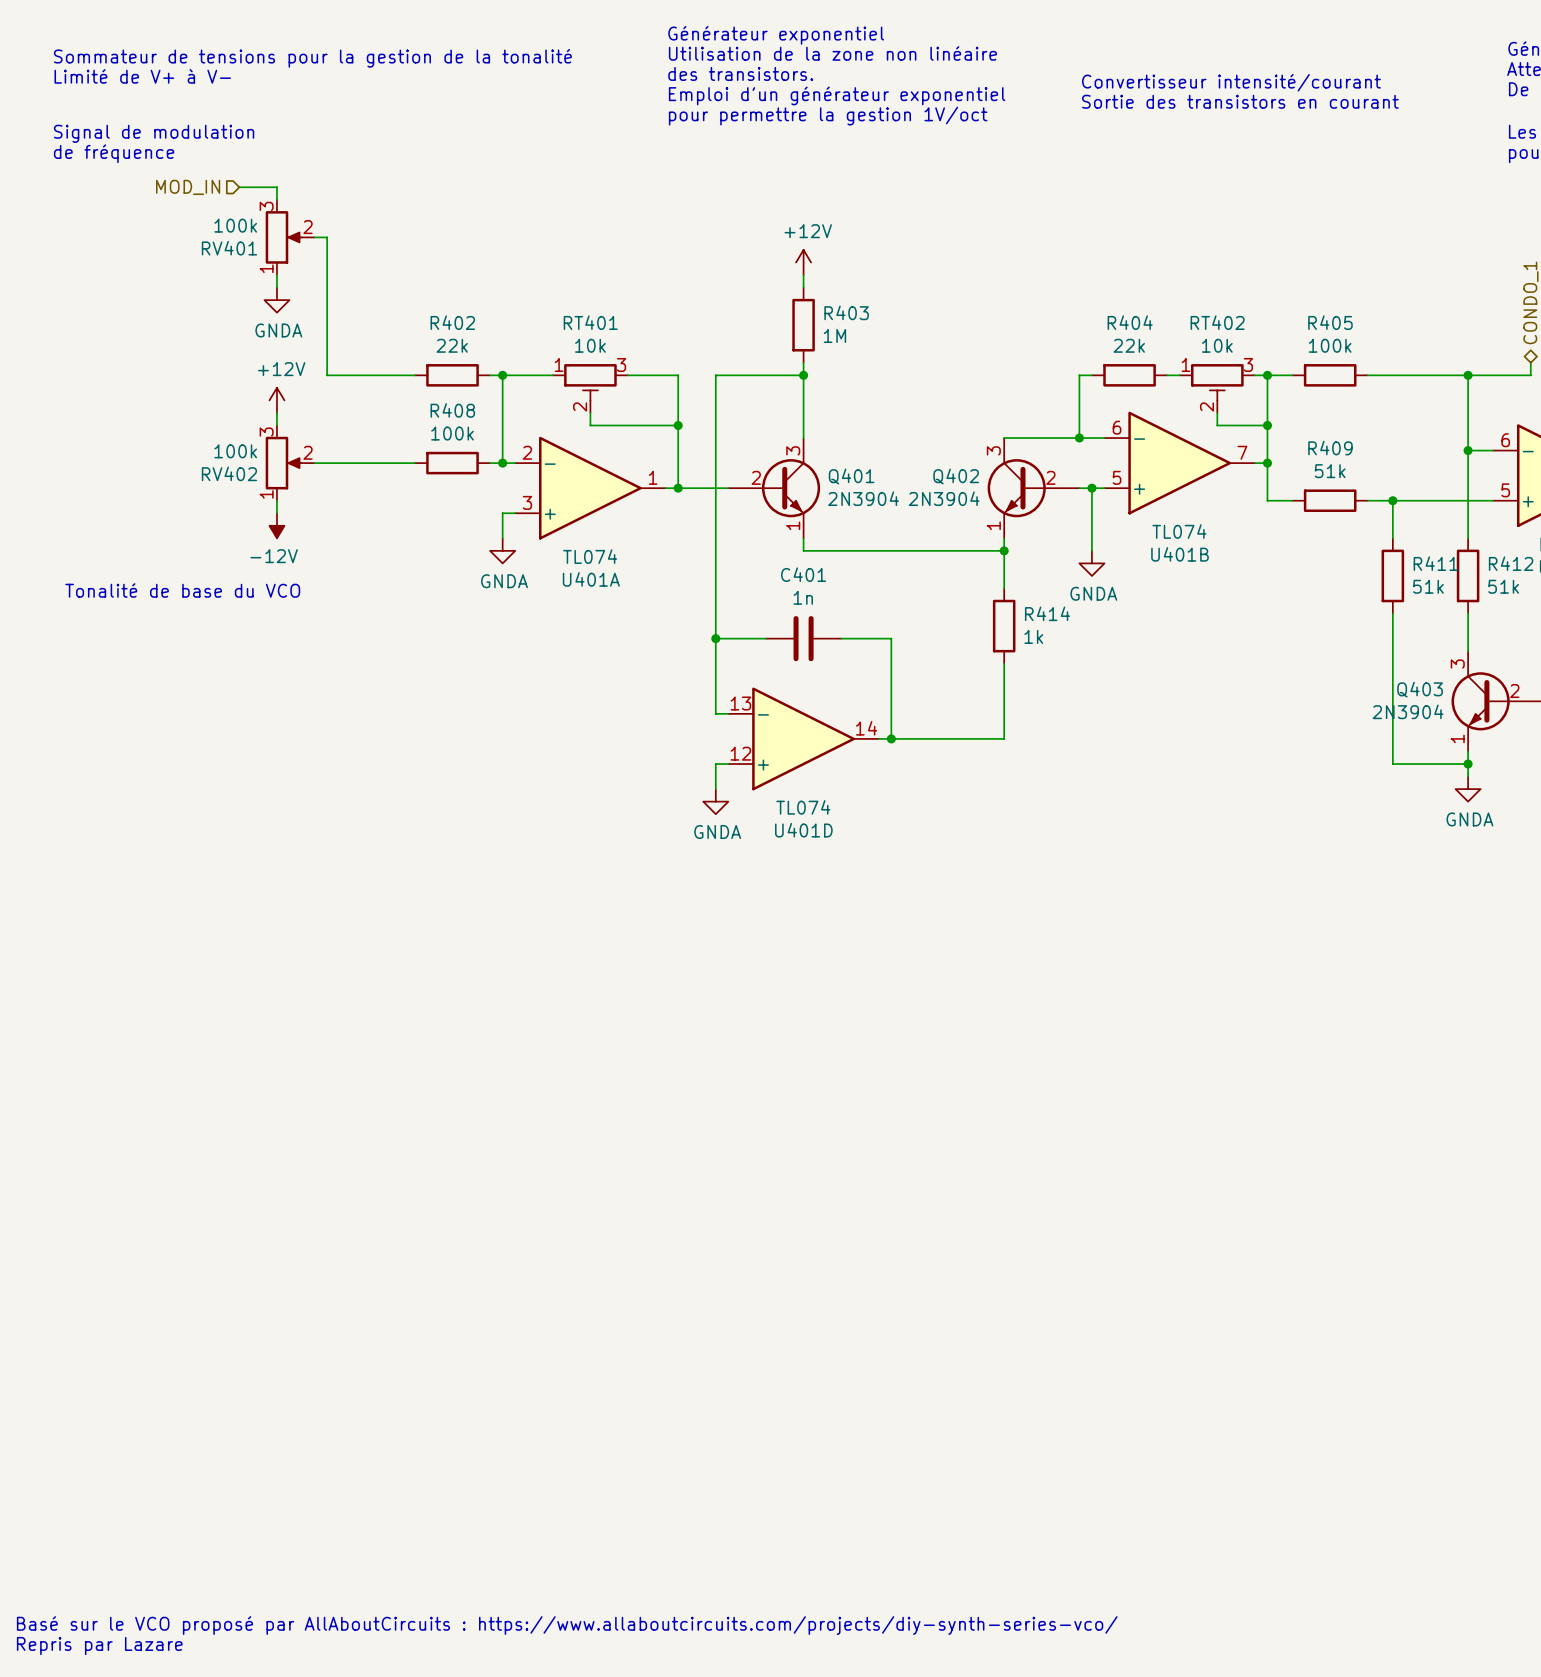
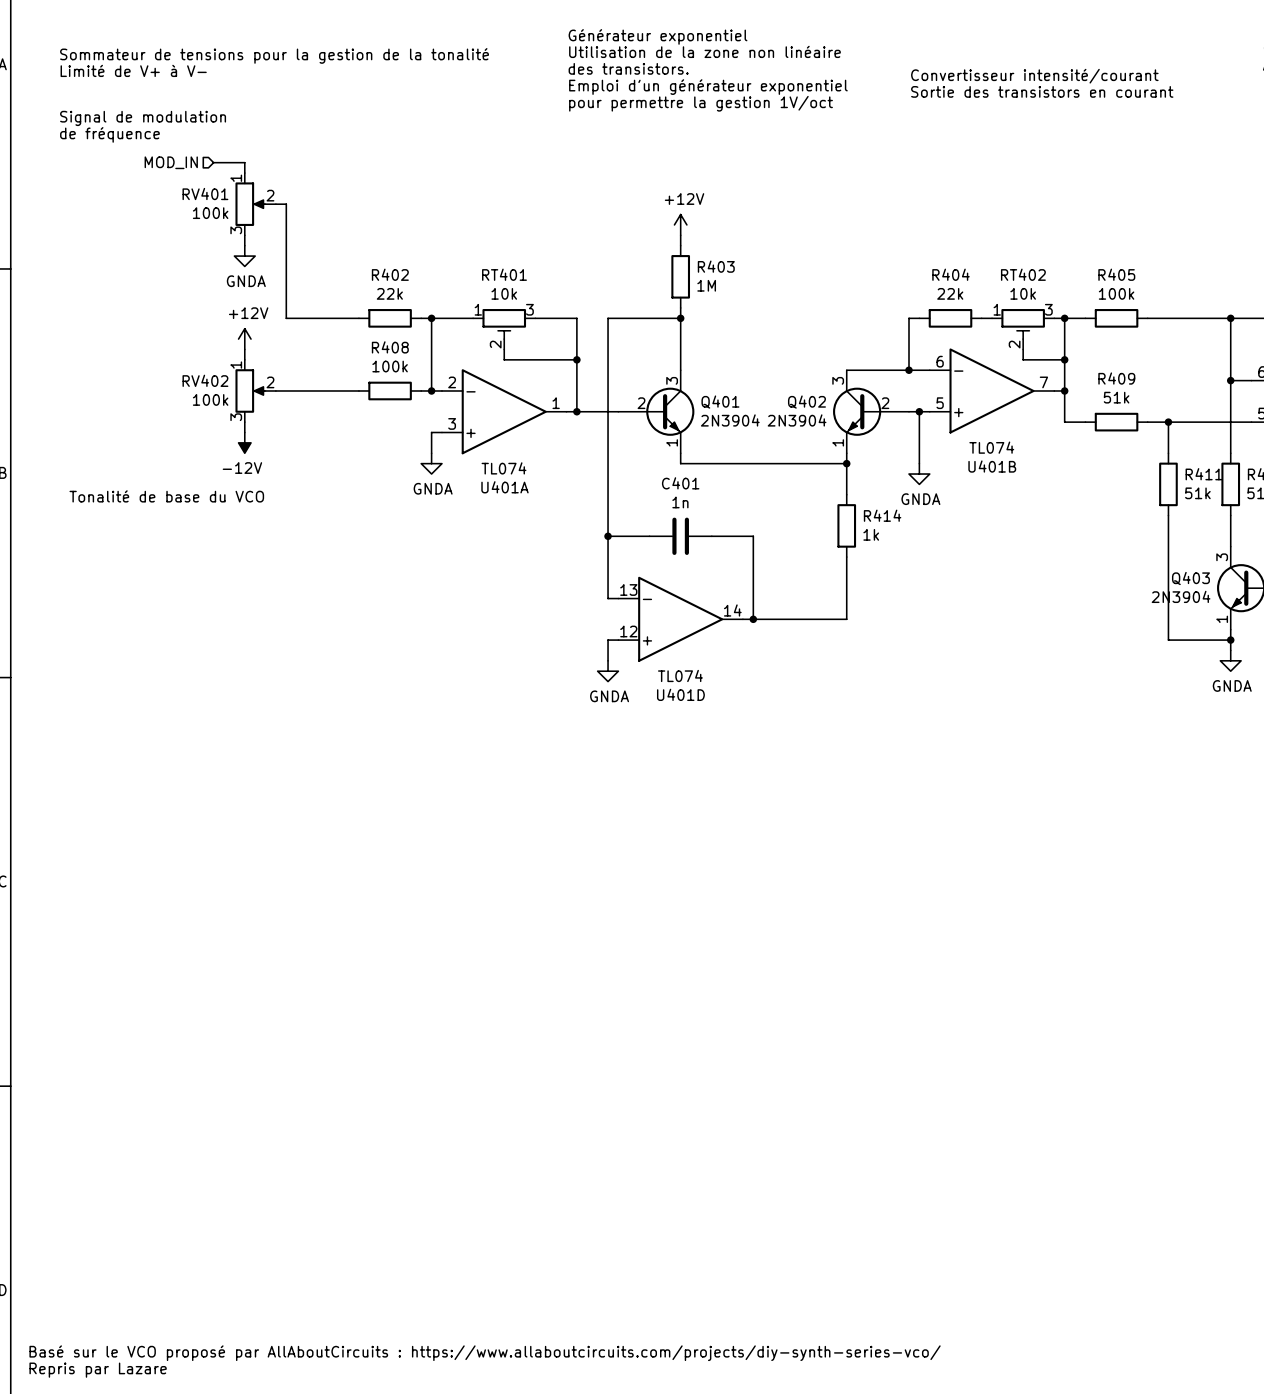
RV401 flip: as is (283, 237) -> up-down (250, 204)
RV402 flip: as is (283, 463) -> up-down (250, 390)

